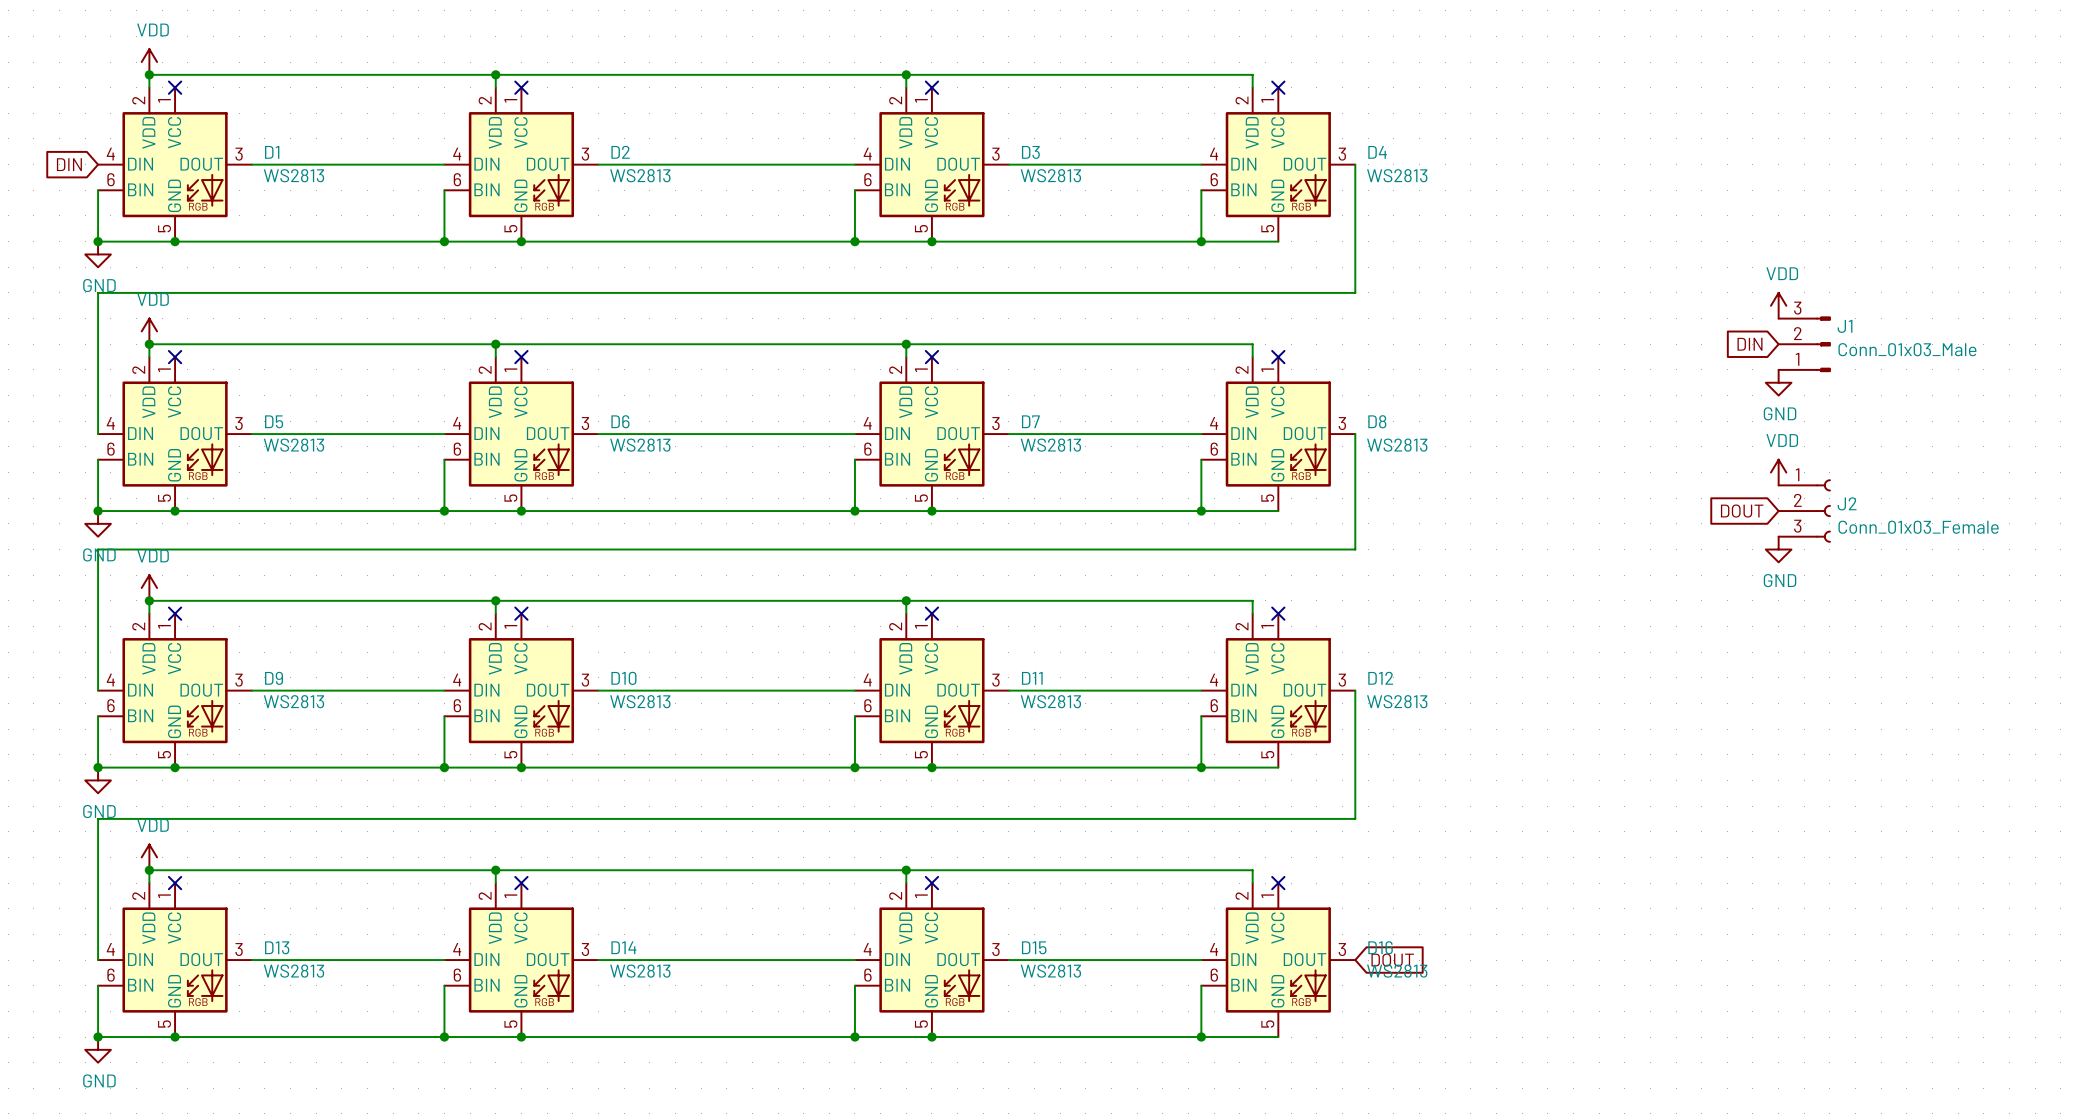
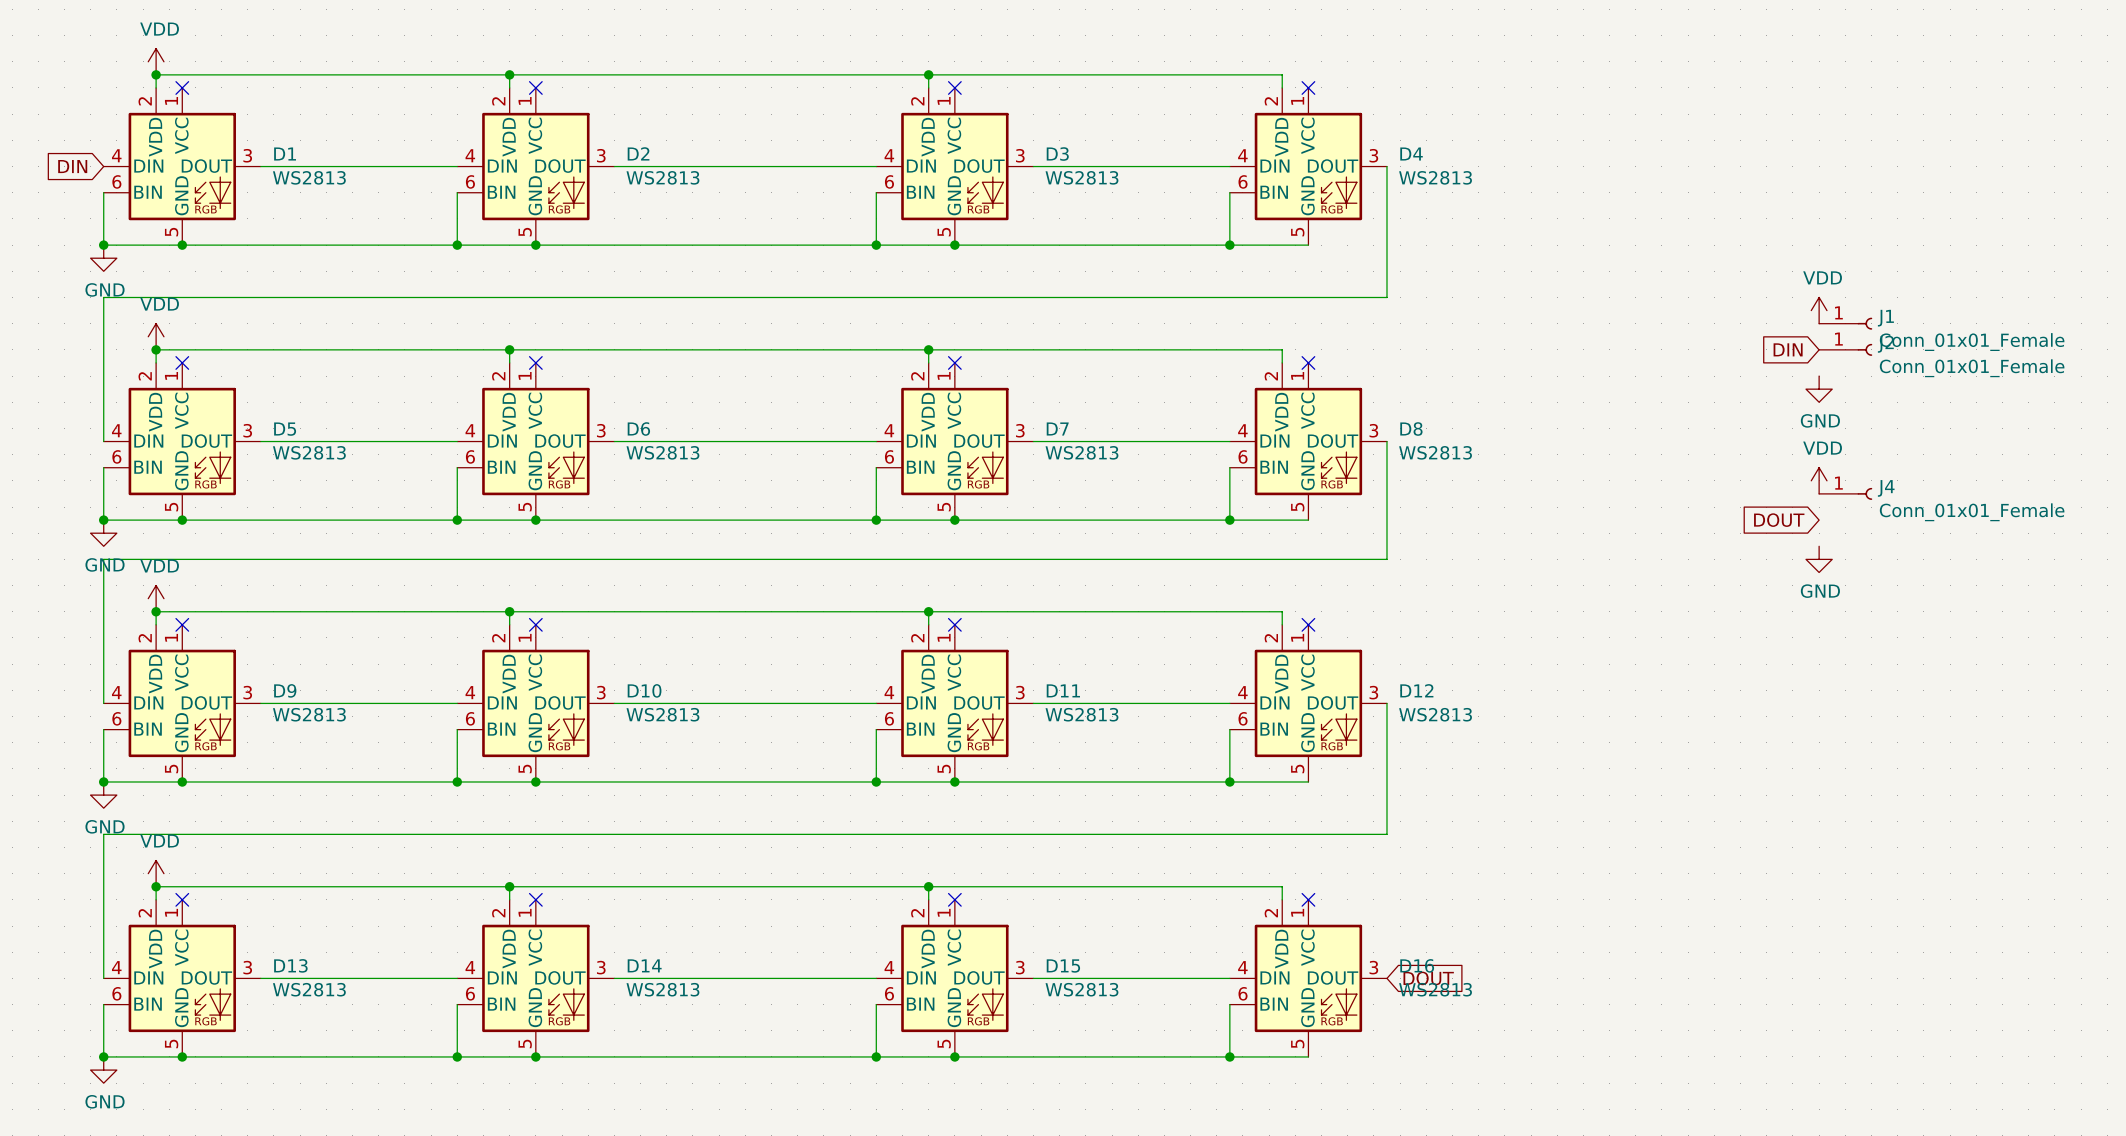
J1 symbol: [1778, 316, 1831, 372] -> [1819, 317, 1873, 330]
J1 value: Conn_01x03_Male (1907, 349) -> Conn_01x01_Female (1972, 342)
J2 symbol: [1778, 479, 1831, 543] -> [1819, 343, 1873, 356]
J4: none -> Conn_01x01_Female (1845, 493)
J2 value: Conn_01x03_Female (1918, 527) -> Conn_01x01_Female (1972, 368)

